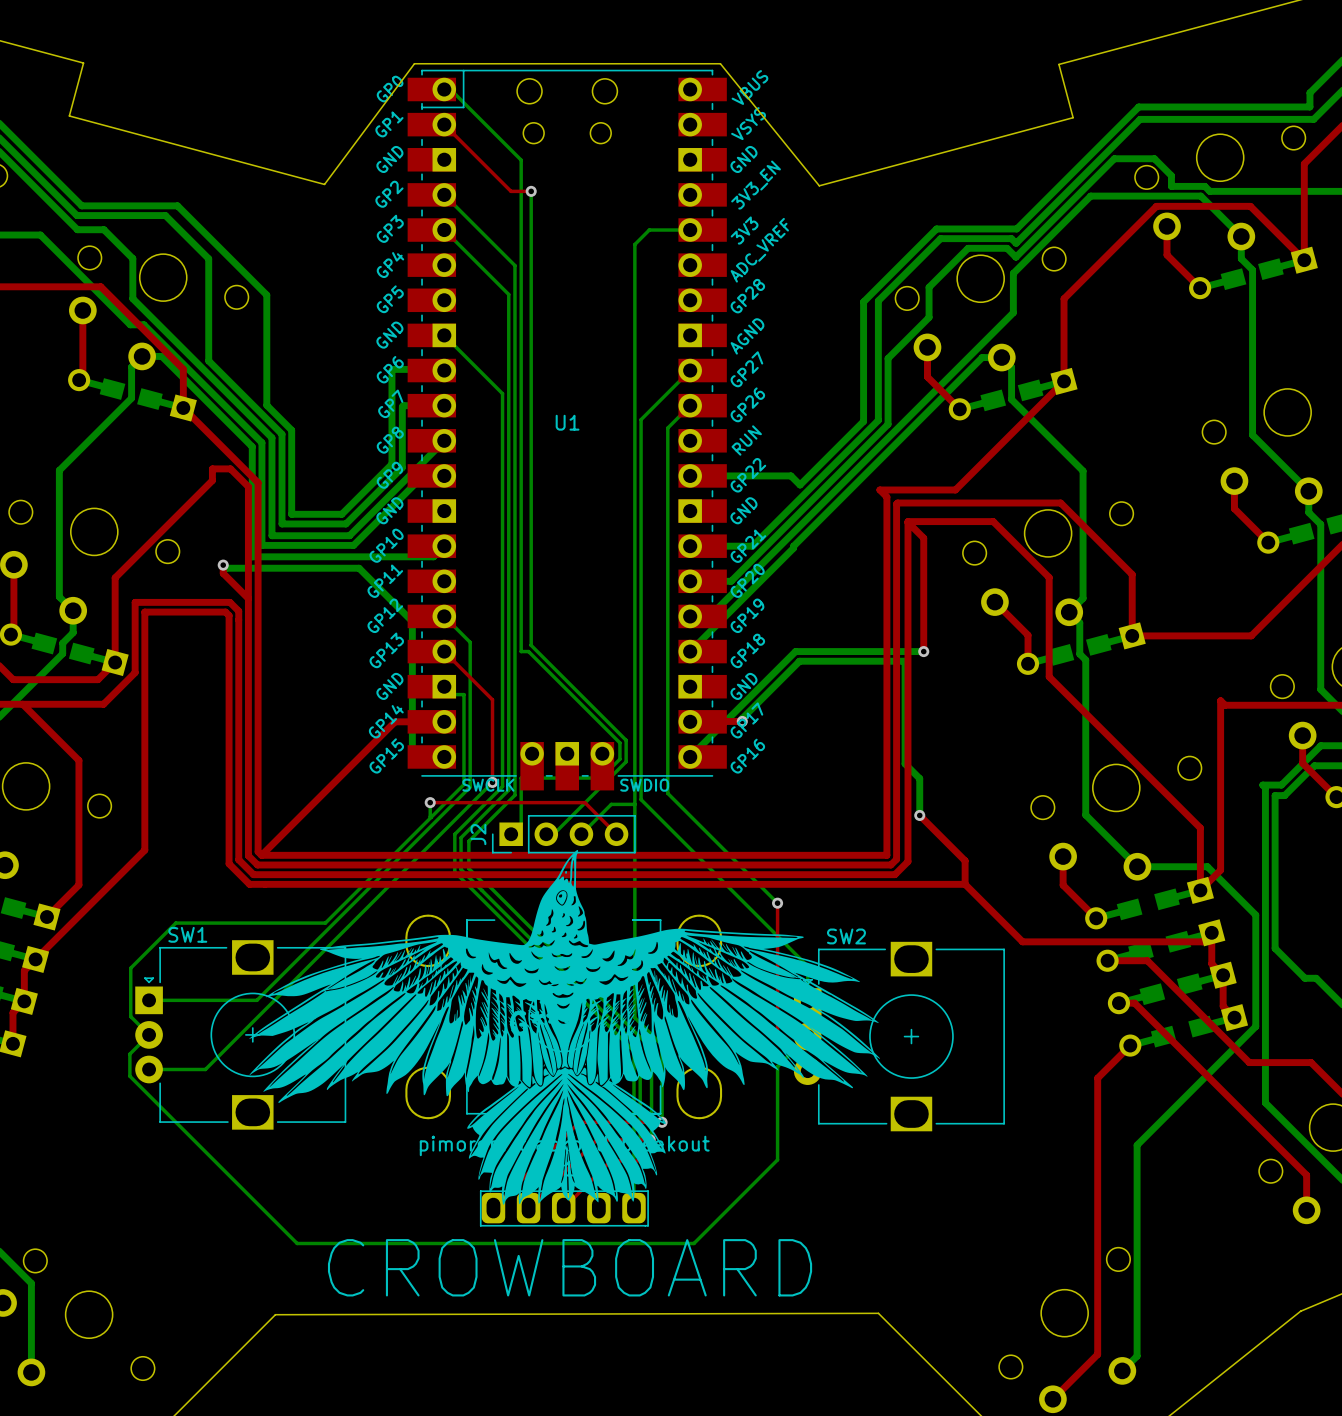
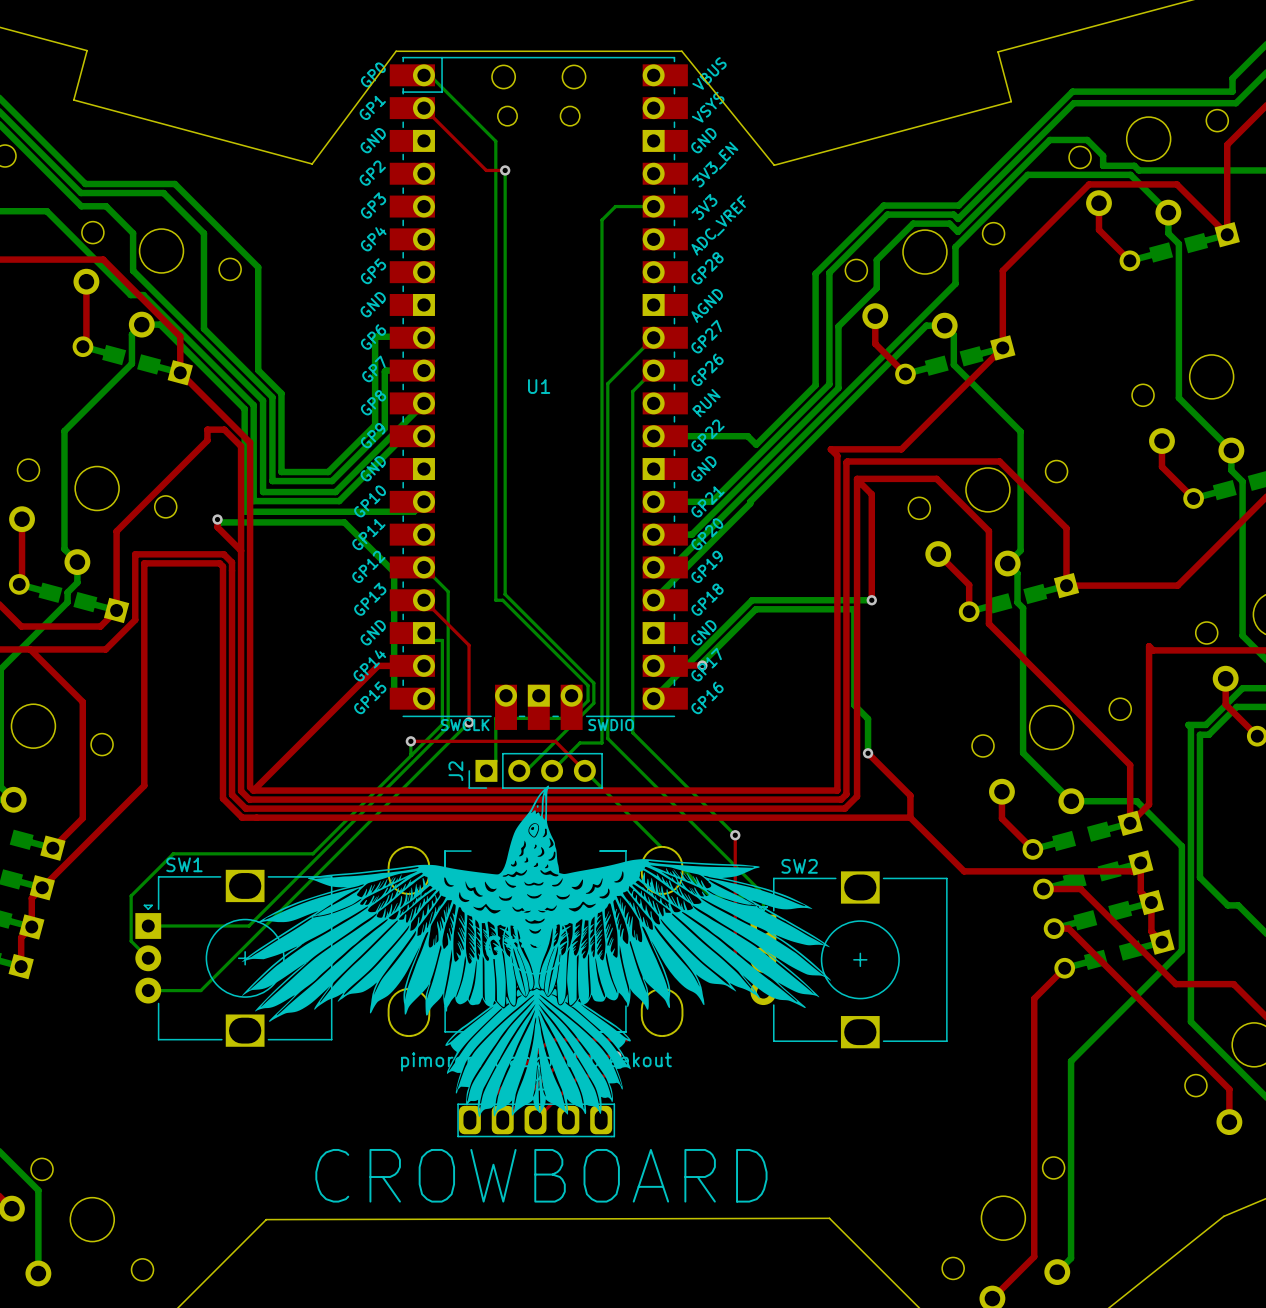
bottom track: (444, 194) (514, 265) (514, 795) (468, 841) (468, 868) (483, 883) (486, 883) (651, 1048) (650, 1139) -> none
bottom track: (444, 230) (508, 294) (508, 790) (461, 837) (461, 869) (640, 1048) (640, 1156) (644, 1160) -> none
bottom track: (444, 335) (502, 393) (502, 786) (454, 834) (454, 872) (633, 1051) (633, 1208) -> none
bottom track: (634, 804) (634, 1017) (662, 1045) (662, 1122) -> none
bottom track: none -> (584, 770) (710, 896) (744, 896)
bottom track: (149, 1034) (129, 1054) (129, 1076) (297, 1243) (693, 1243) (777, 1159) (777, 1066) (807, 1036) -> none
via: (662, 1122) -> none

